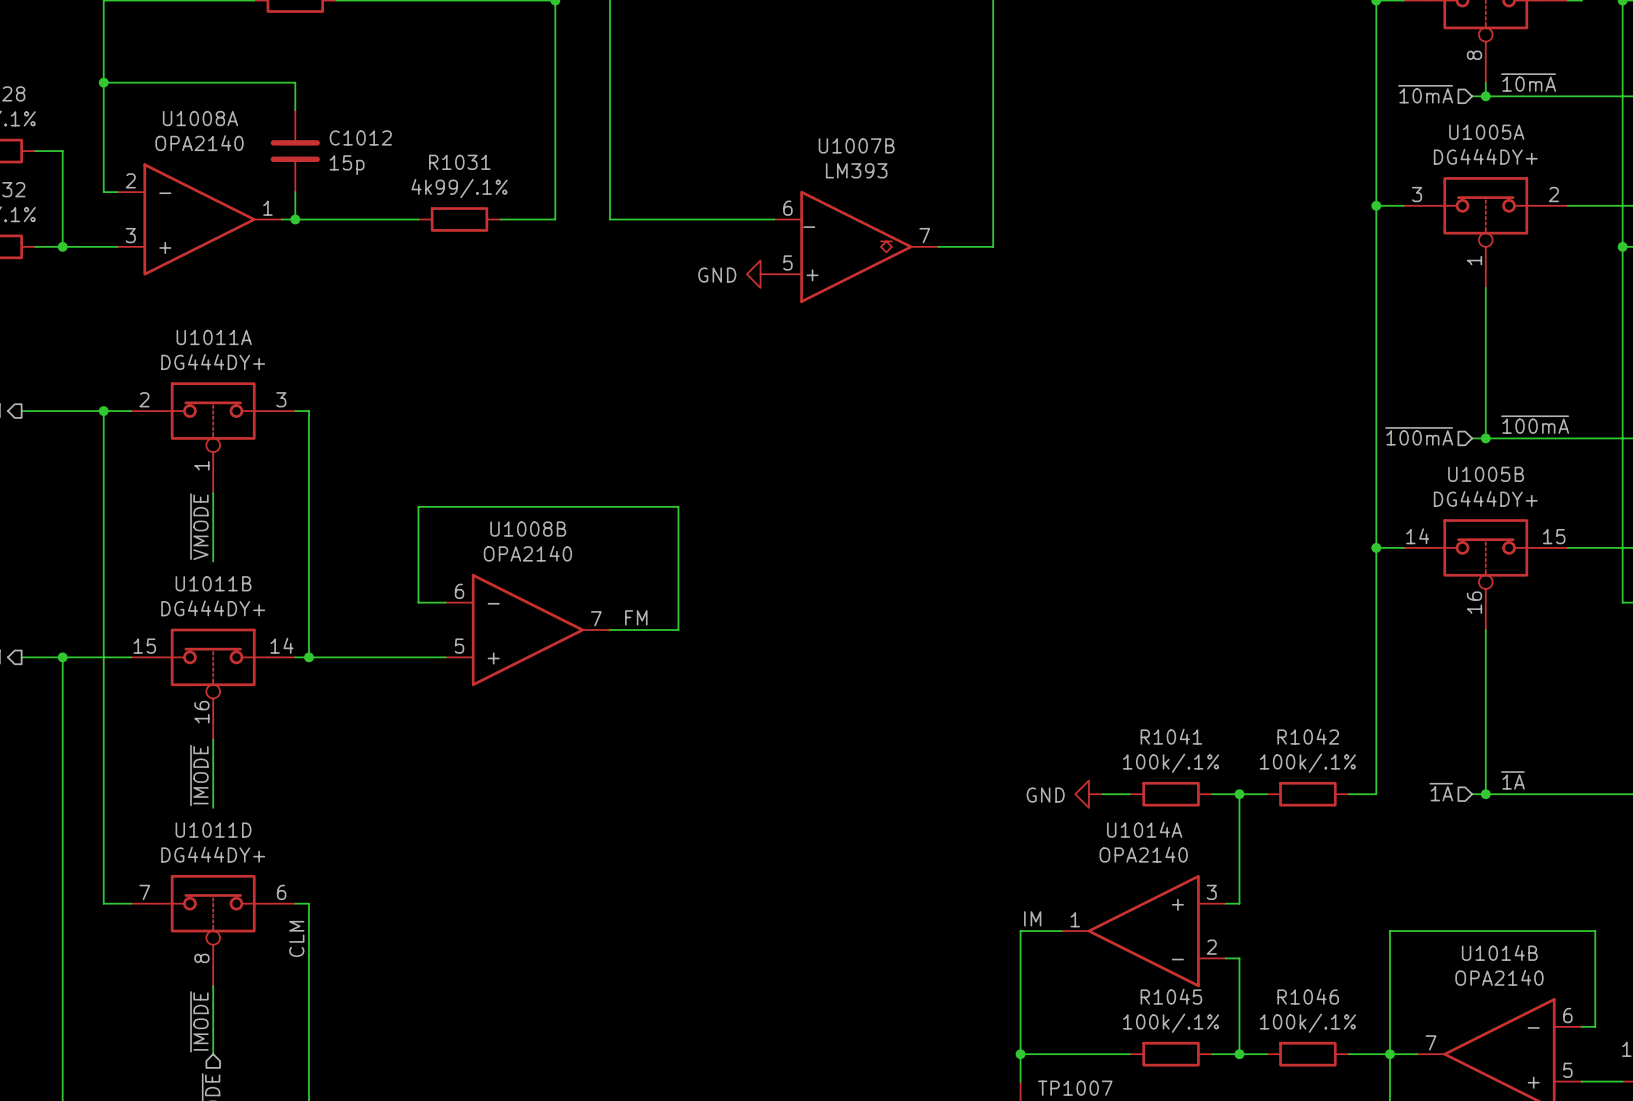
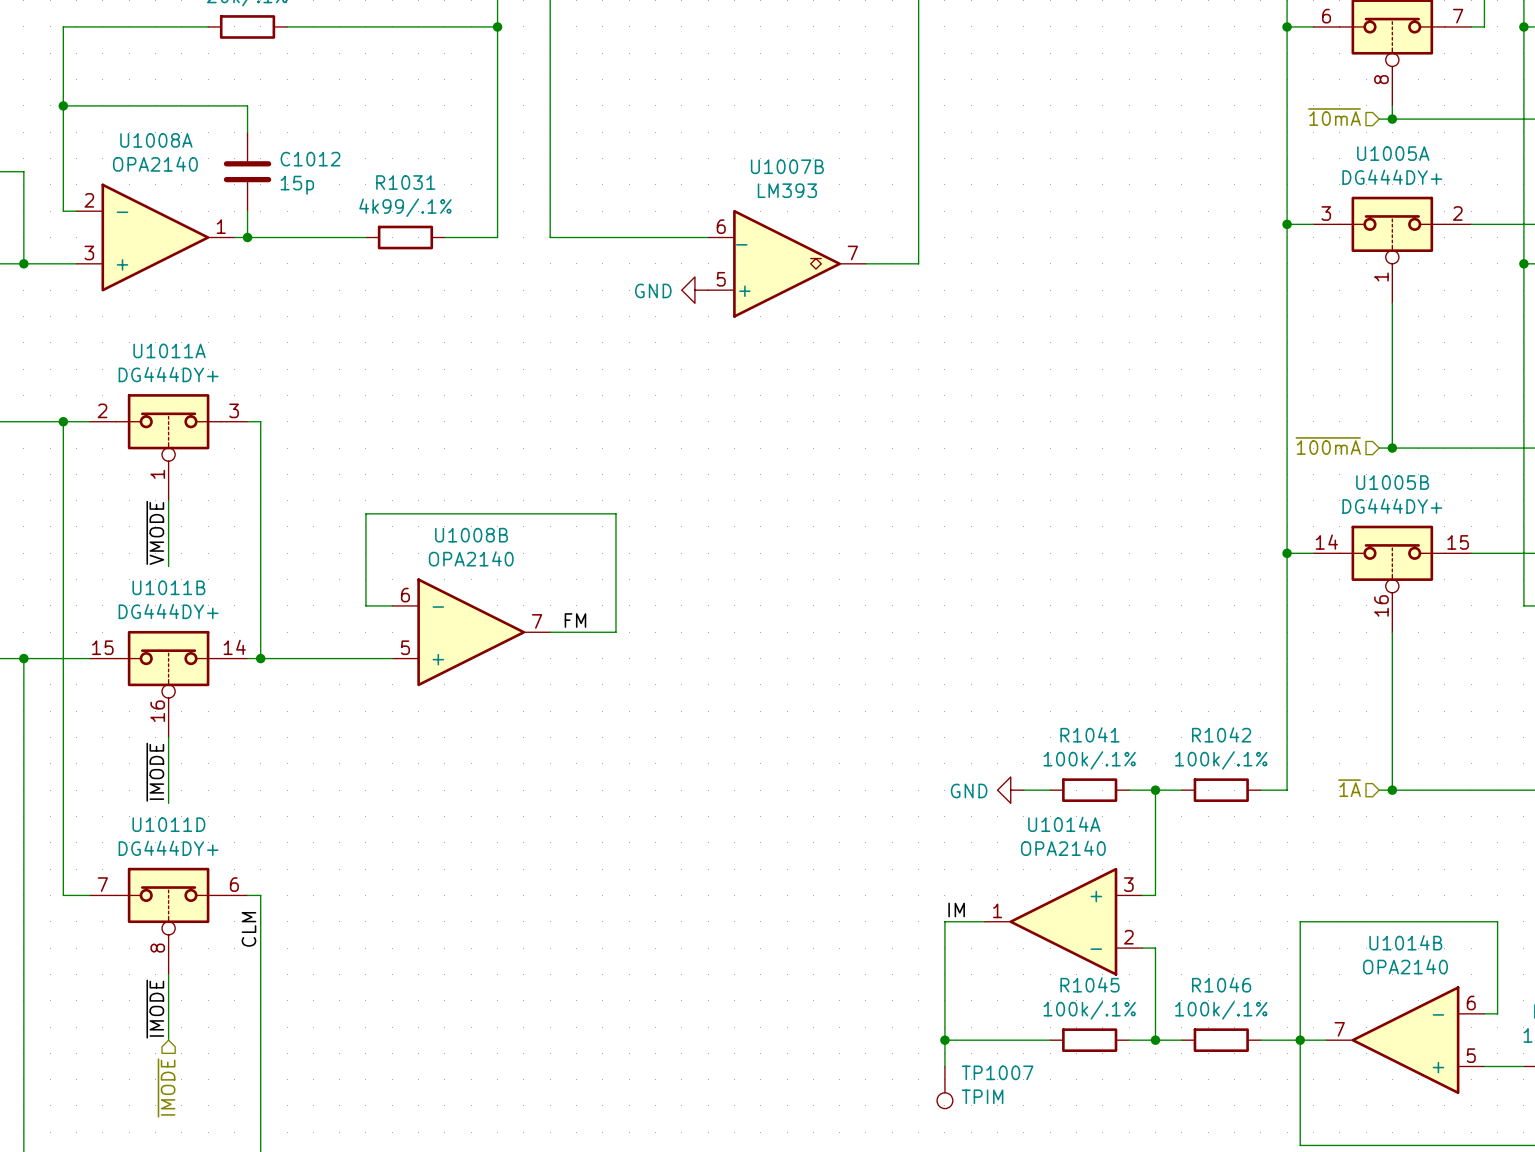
label: ~{10mA} (1528, 82) -> none
label: ~{100mA} (1535, 424) -> none
label: ~{1A} (1512, 780) -> none

